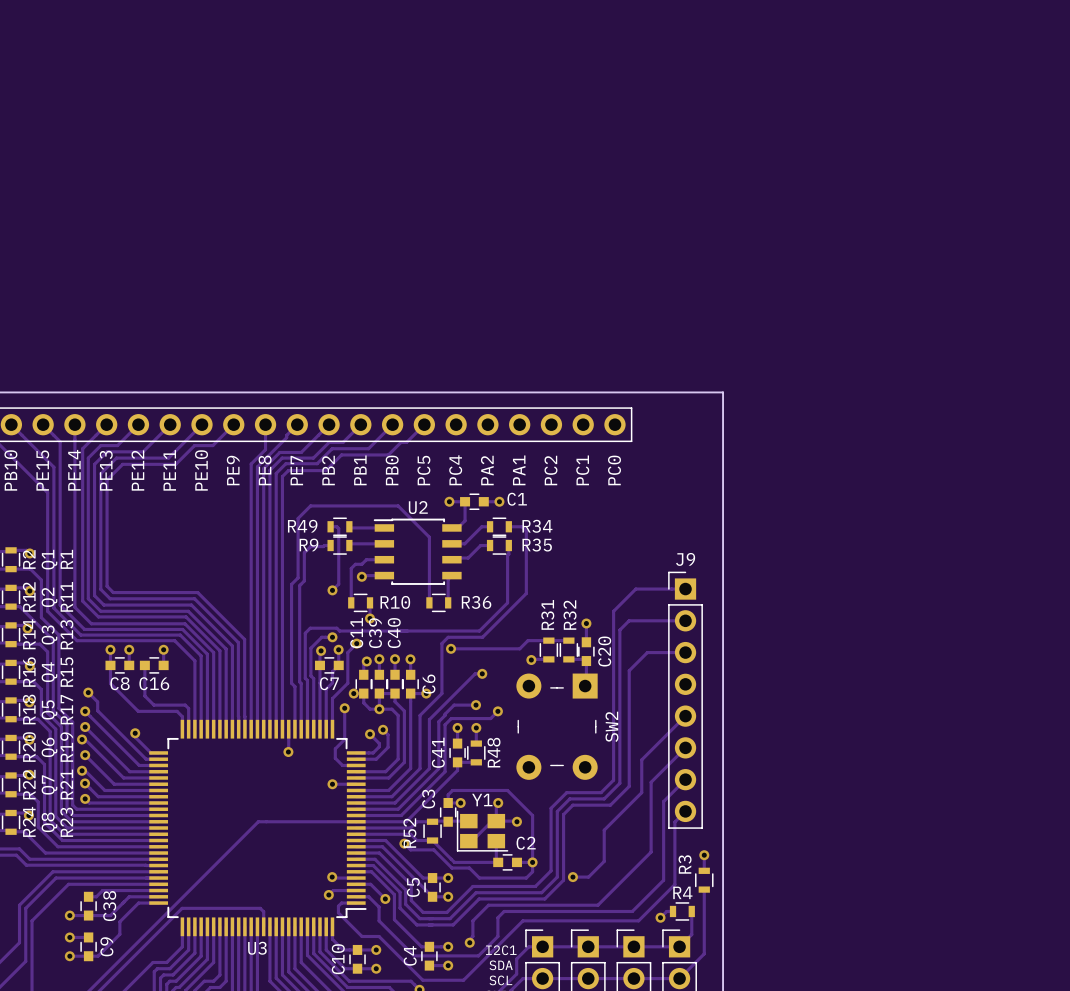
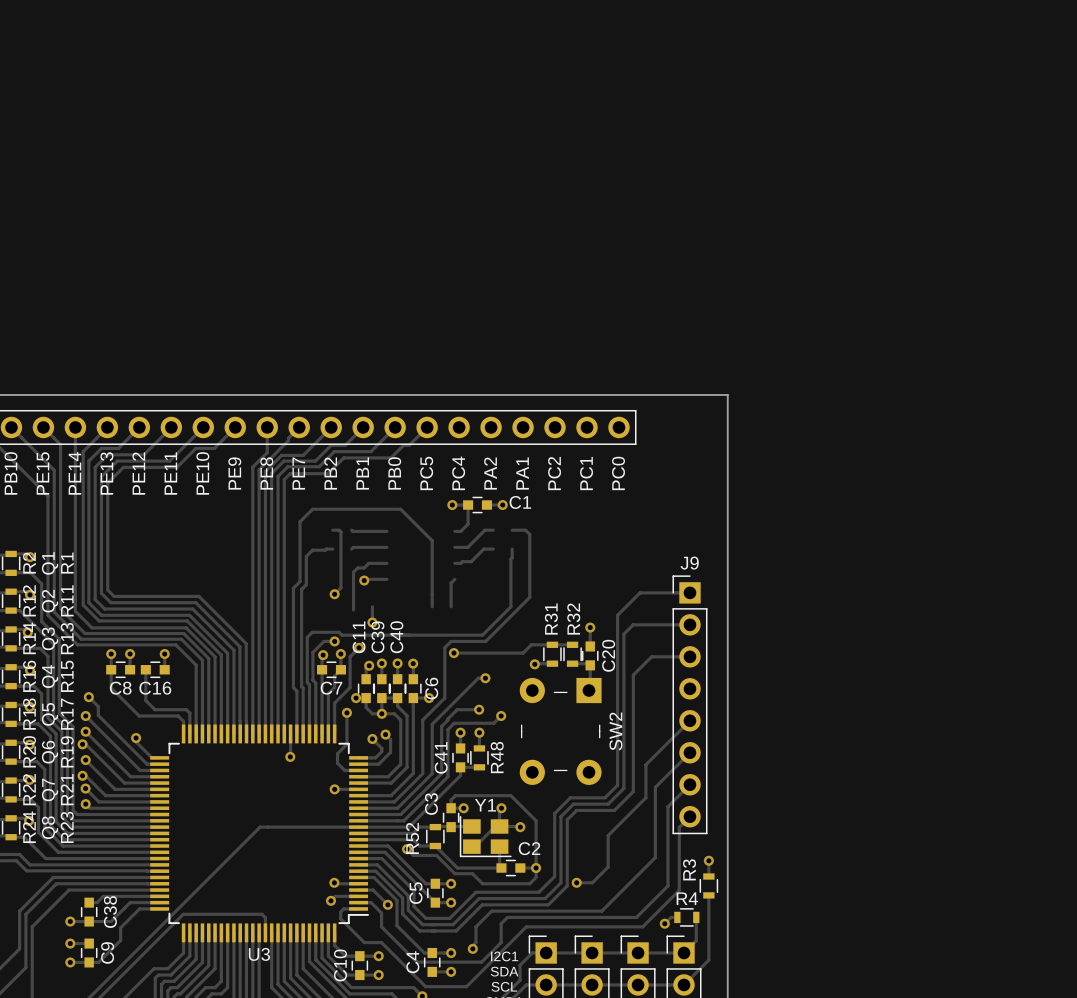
R49: (339, 526) -> none
R34: (499, 526) -> none
R9: (339, 545) -> none
R35: (499, 545) -> none
U2: (417, 551) -> none
R10: (360, 602) -> none
R36: (438, 602) -> none

